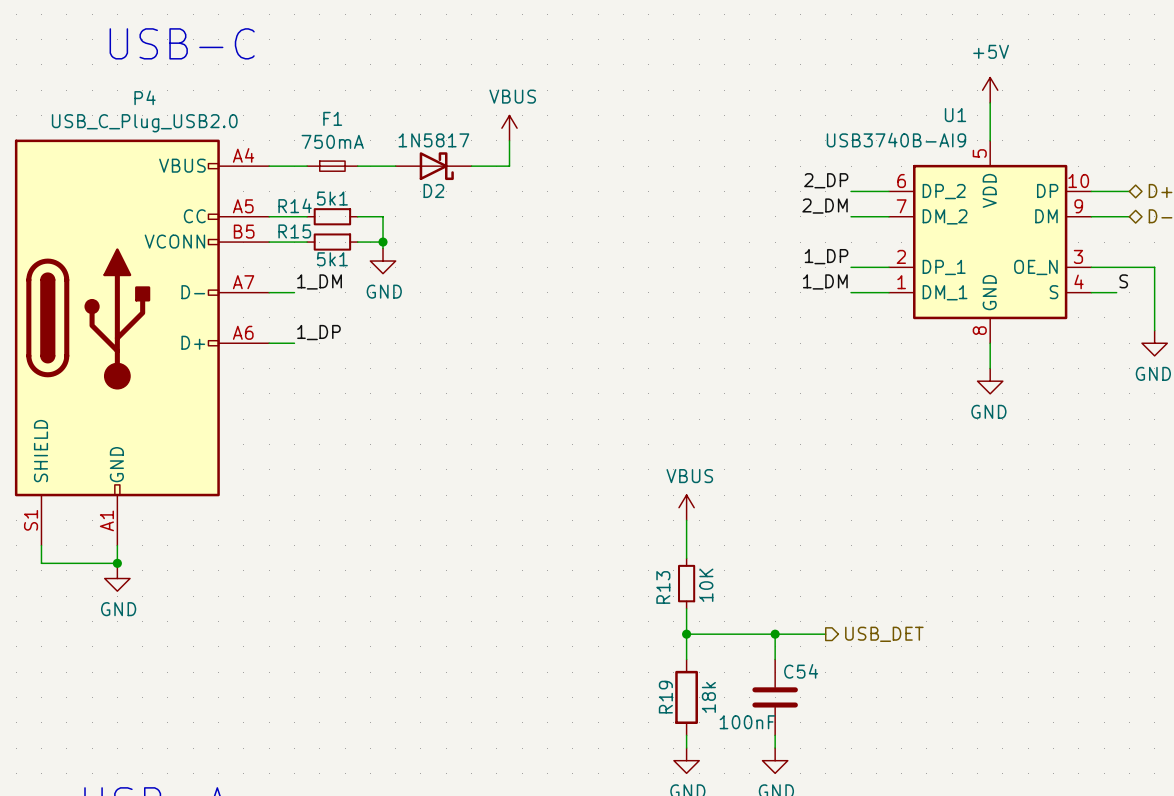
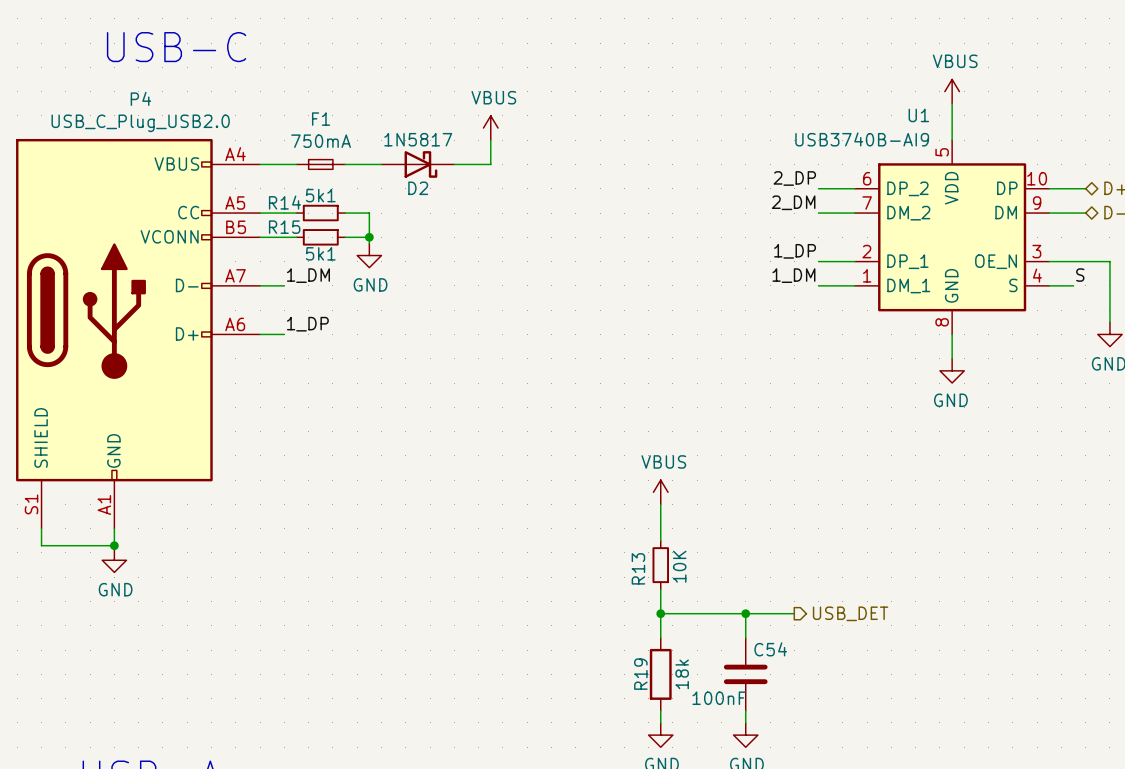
power symbol: +5V (990, 90) -> VBUS (952, 91)

